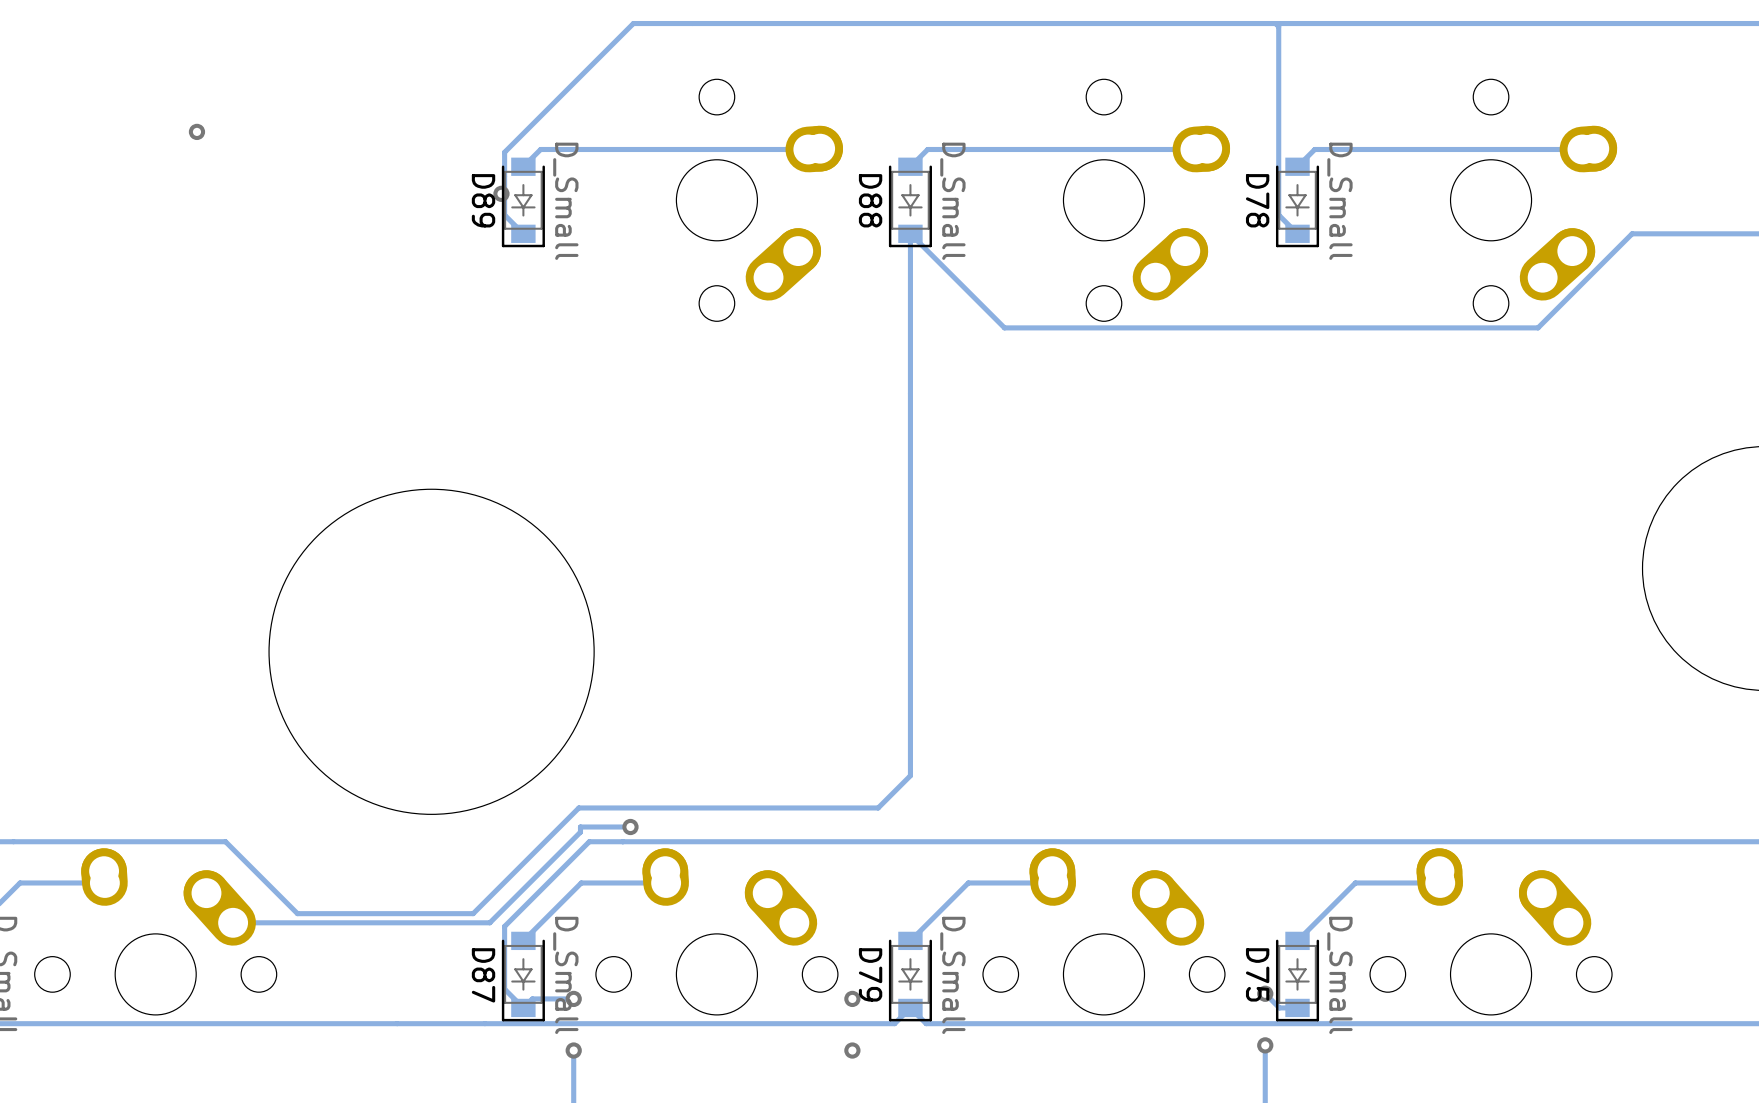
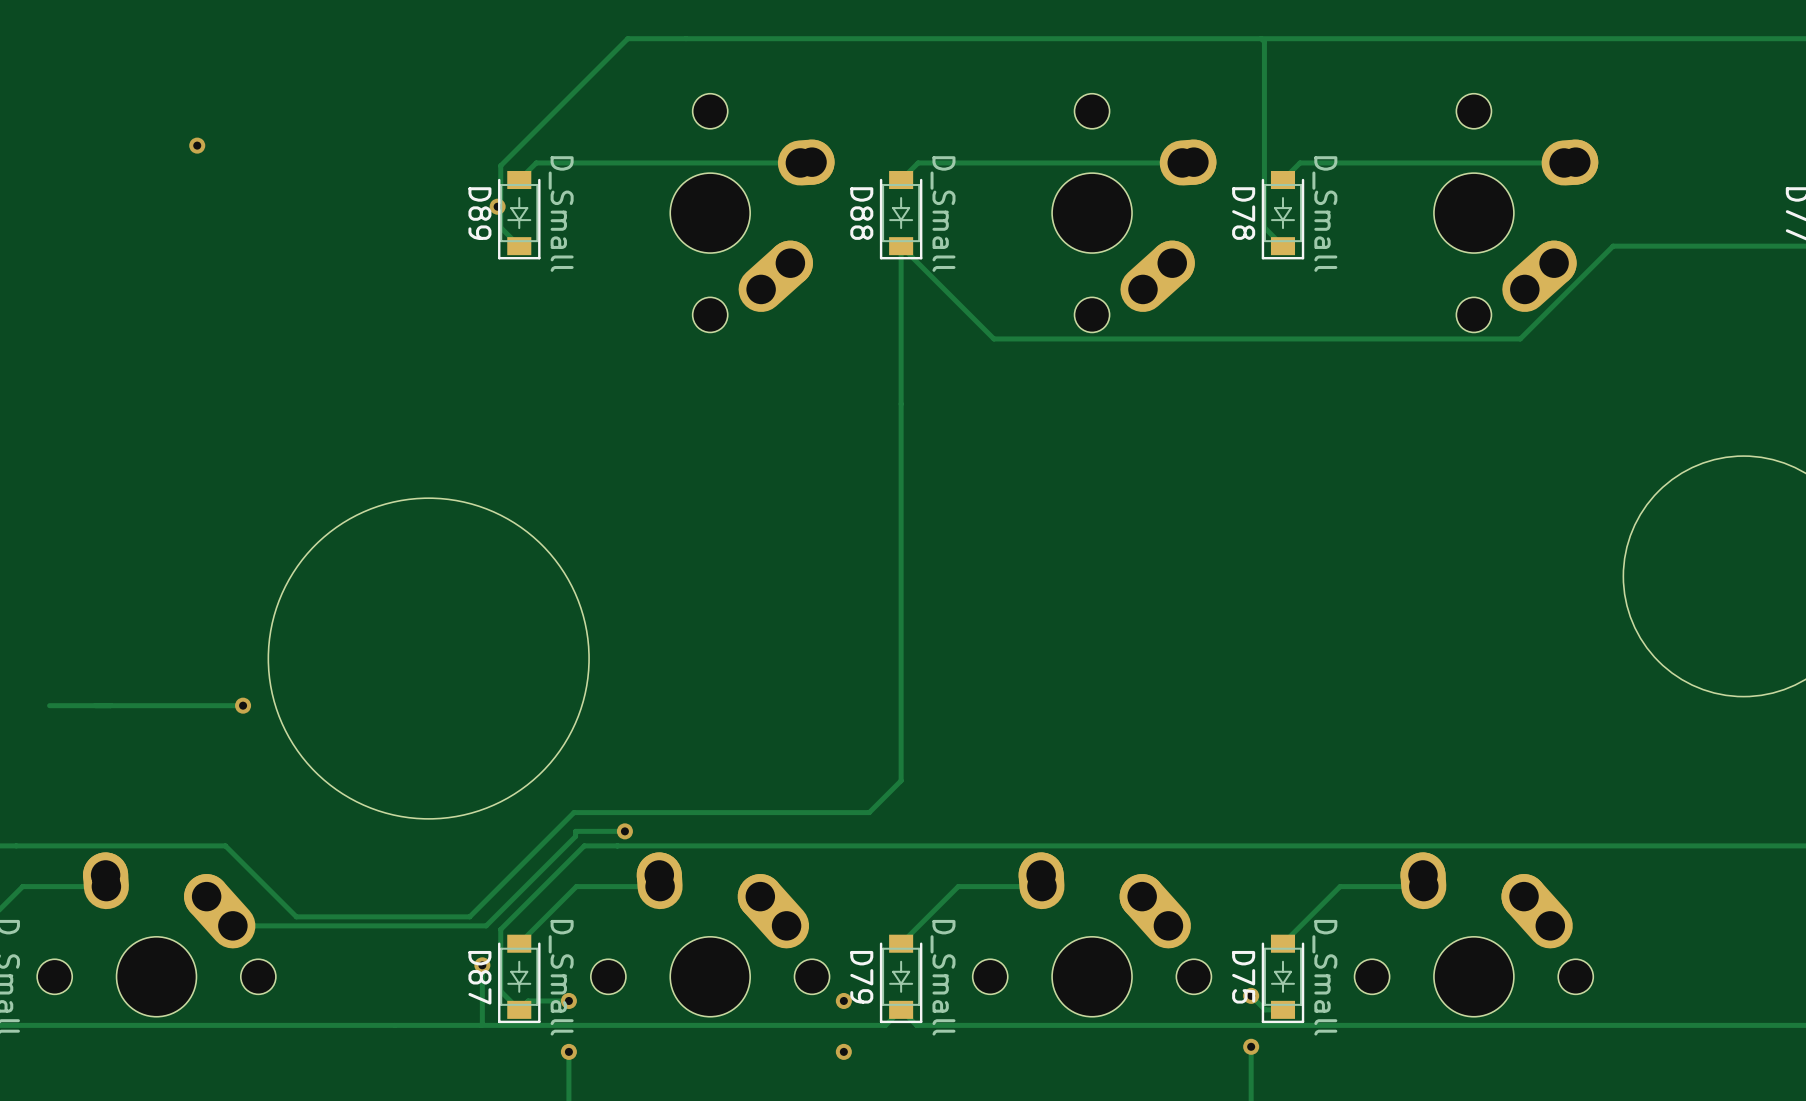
track: none -> (243, 705) (49, 705)
via: none -> (243, 705)
track: none -> (482, 965) (481, 1025)
via: none -> (482, 965)

